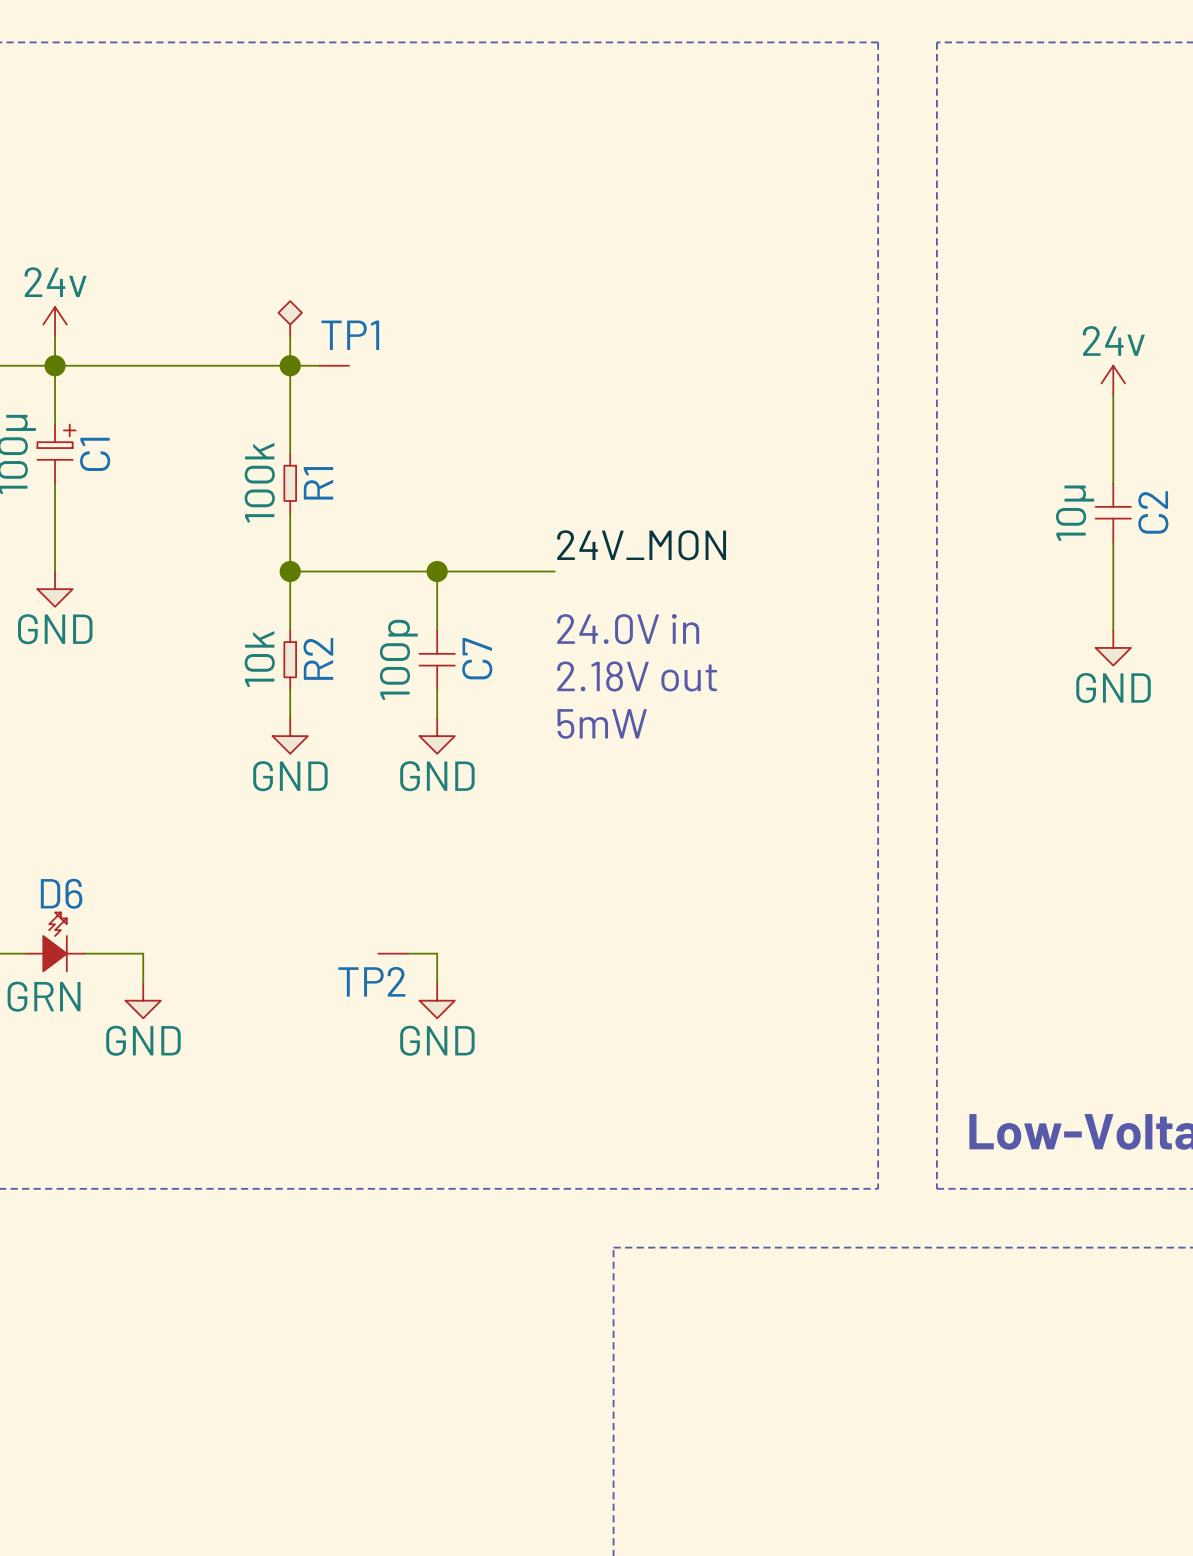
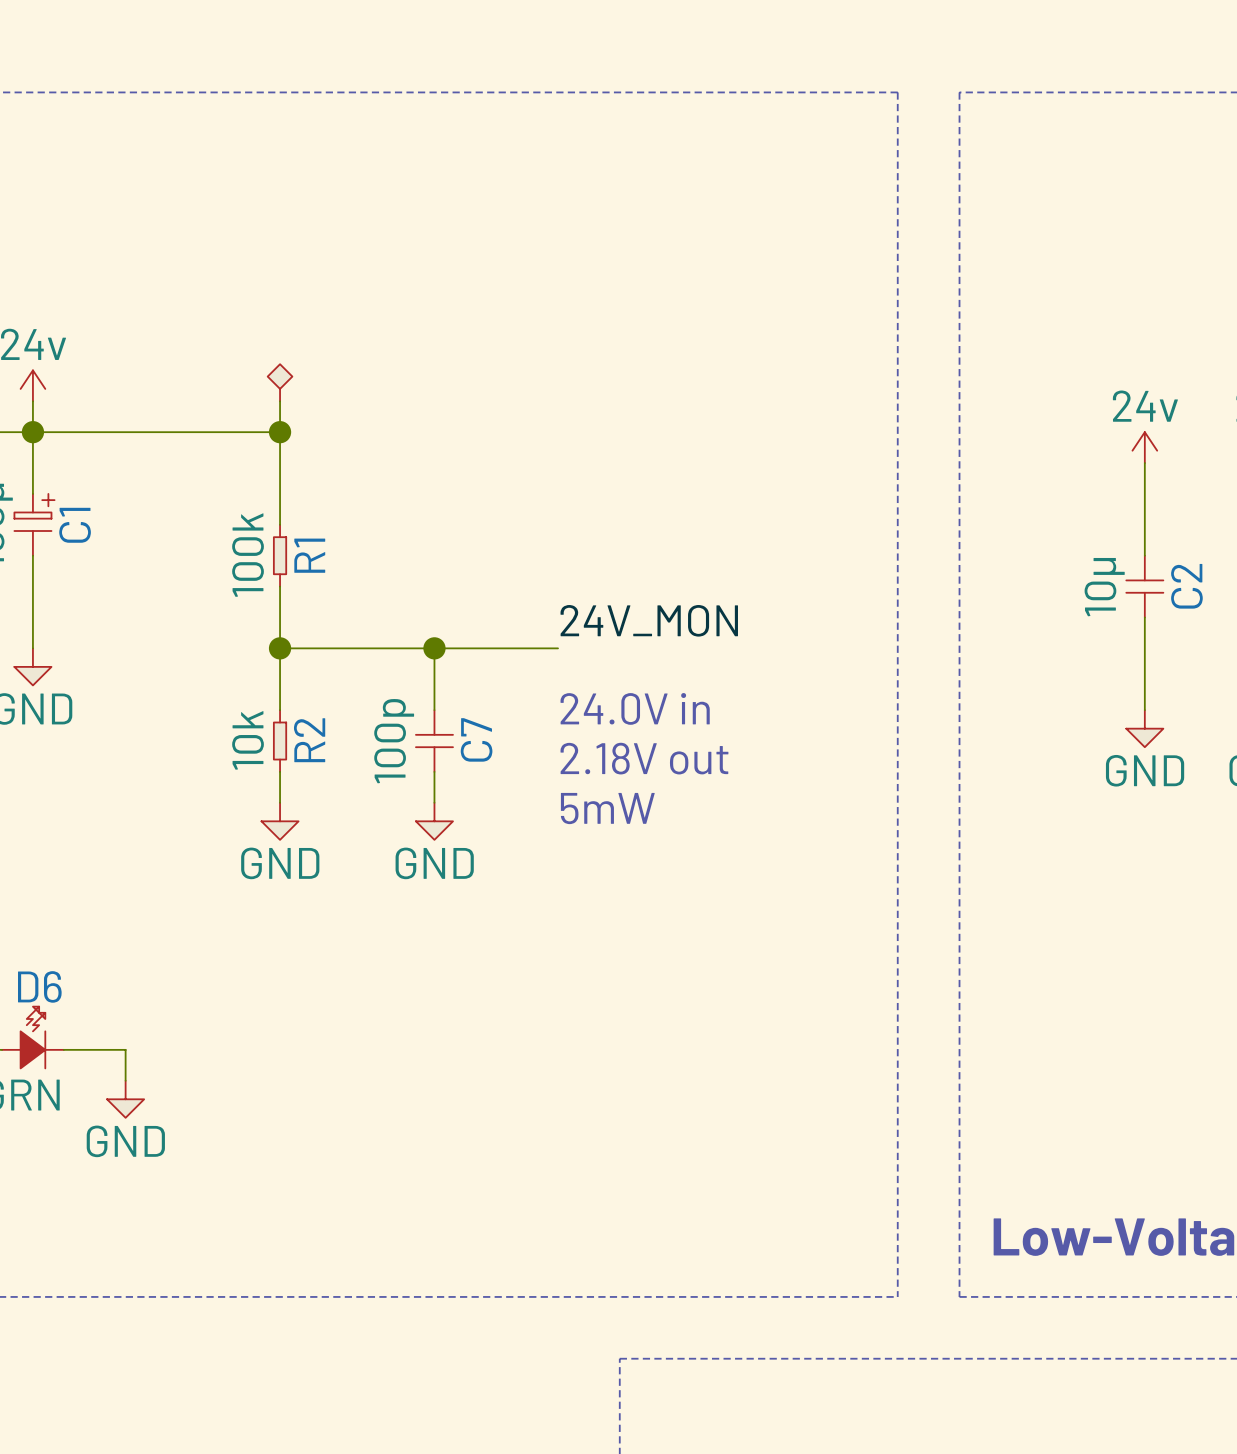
wire: (290, 365) (319, 365) -> none
TP1: (340, 365) -> none
TP2: (386, 953) -> none
wire: (407, 953) (437, 953) (437, 983) -> none
power symbol: GND (437, 1000) -> none

